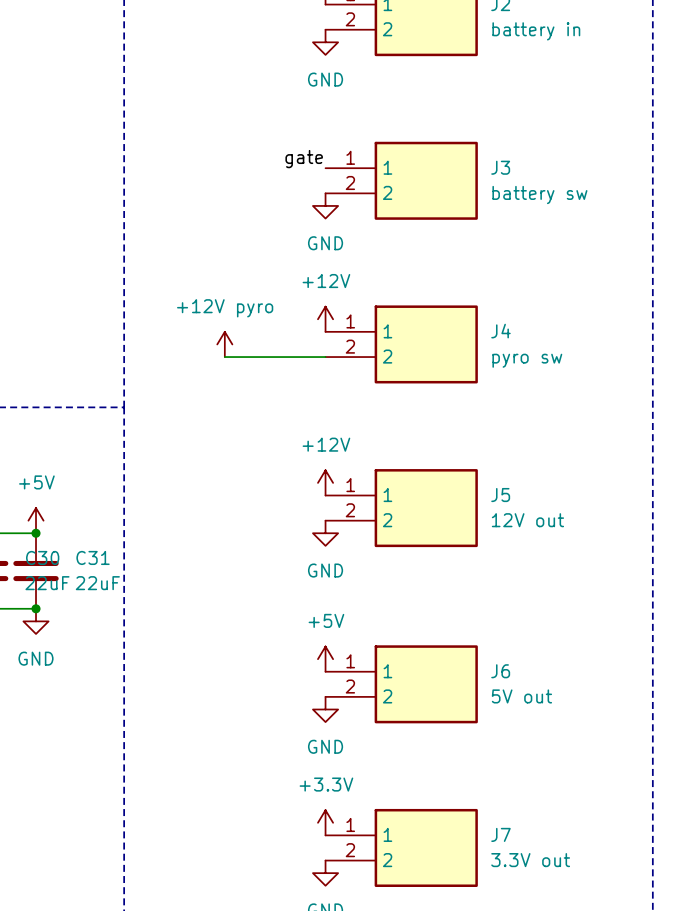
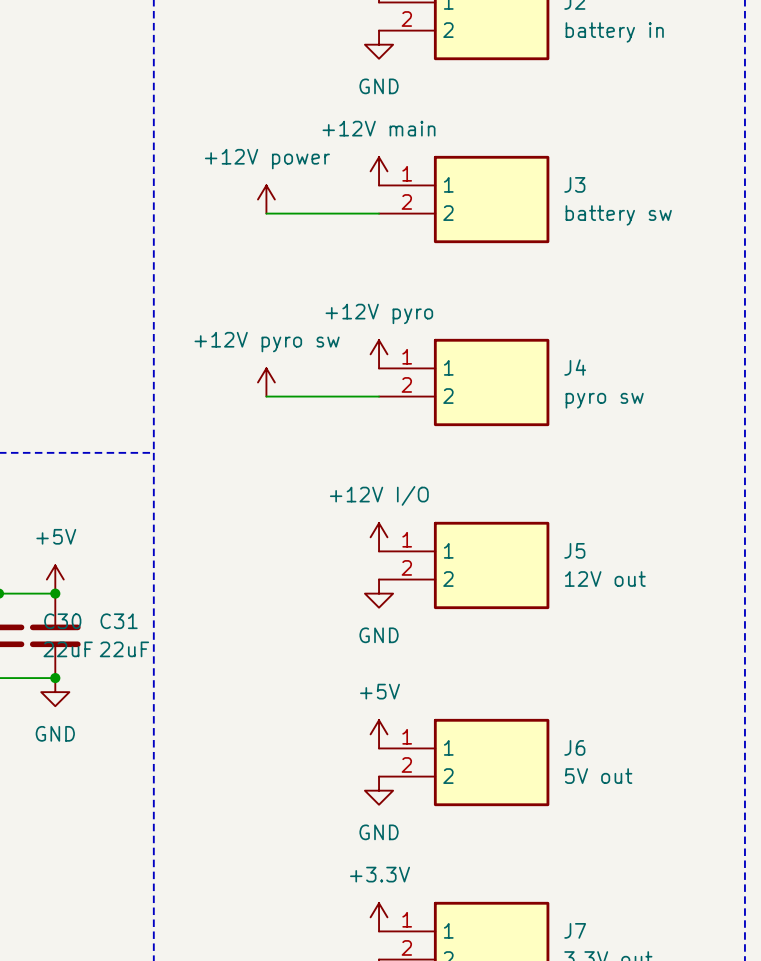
power symbol: none -> +12V main (379, 171)
label: gate (304, 159) -> none
power symbol: none -> +12V power (266, 199)
wire: none -> (266, 213) (379, 213)
power symbol: GND (325, 205) -> none
power symbol: +12V (325, 319) -> +12V pyro (379, 354)
power symbol: +12V pyro (224, 344) -> +12V pyro sw (266, 382)
power symbol: +12V (325, 482) -> +12V I/O (379, 537)

